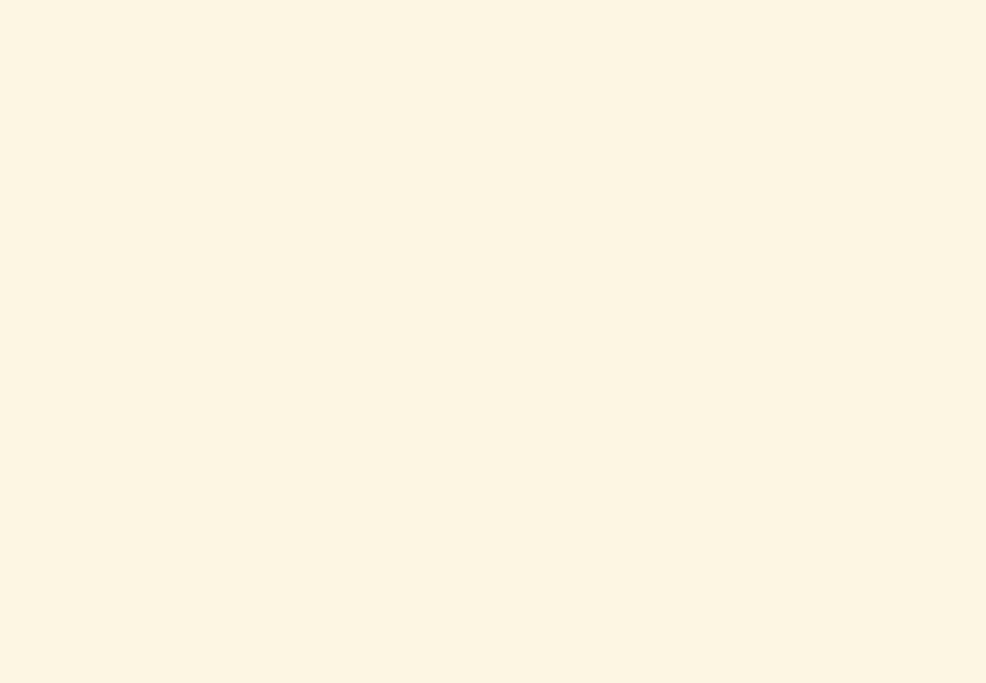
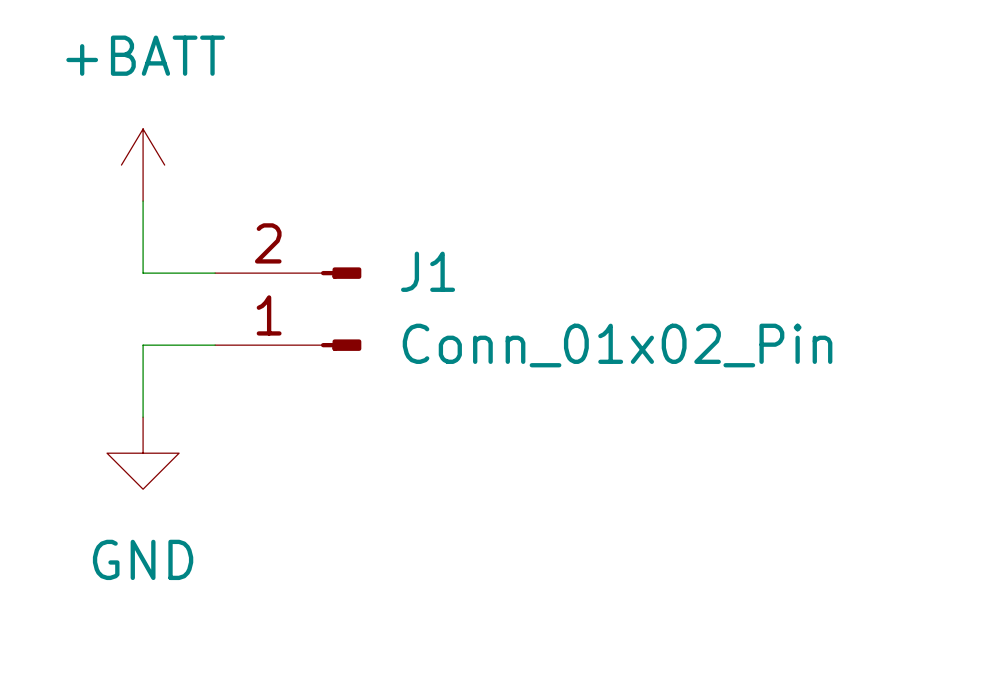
power symbol: none -> +BATT (143, 165)
wire: none -> (143, 201) (143, 273) (215, 273)
J1: none -> Conn_01x02_Pin (288, 309)
wire: none -> (215, 345) (143, 345) (143, 417)
power symbol: none -> GND (143, 453)

